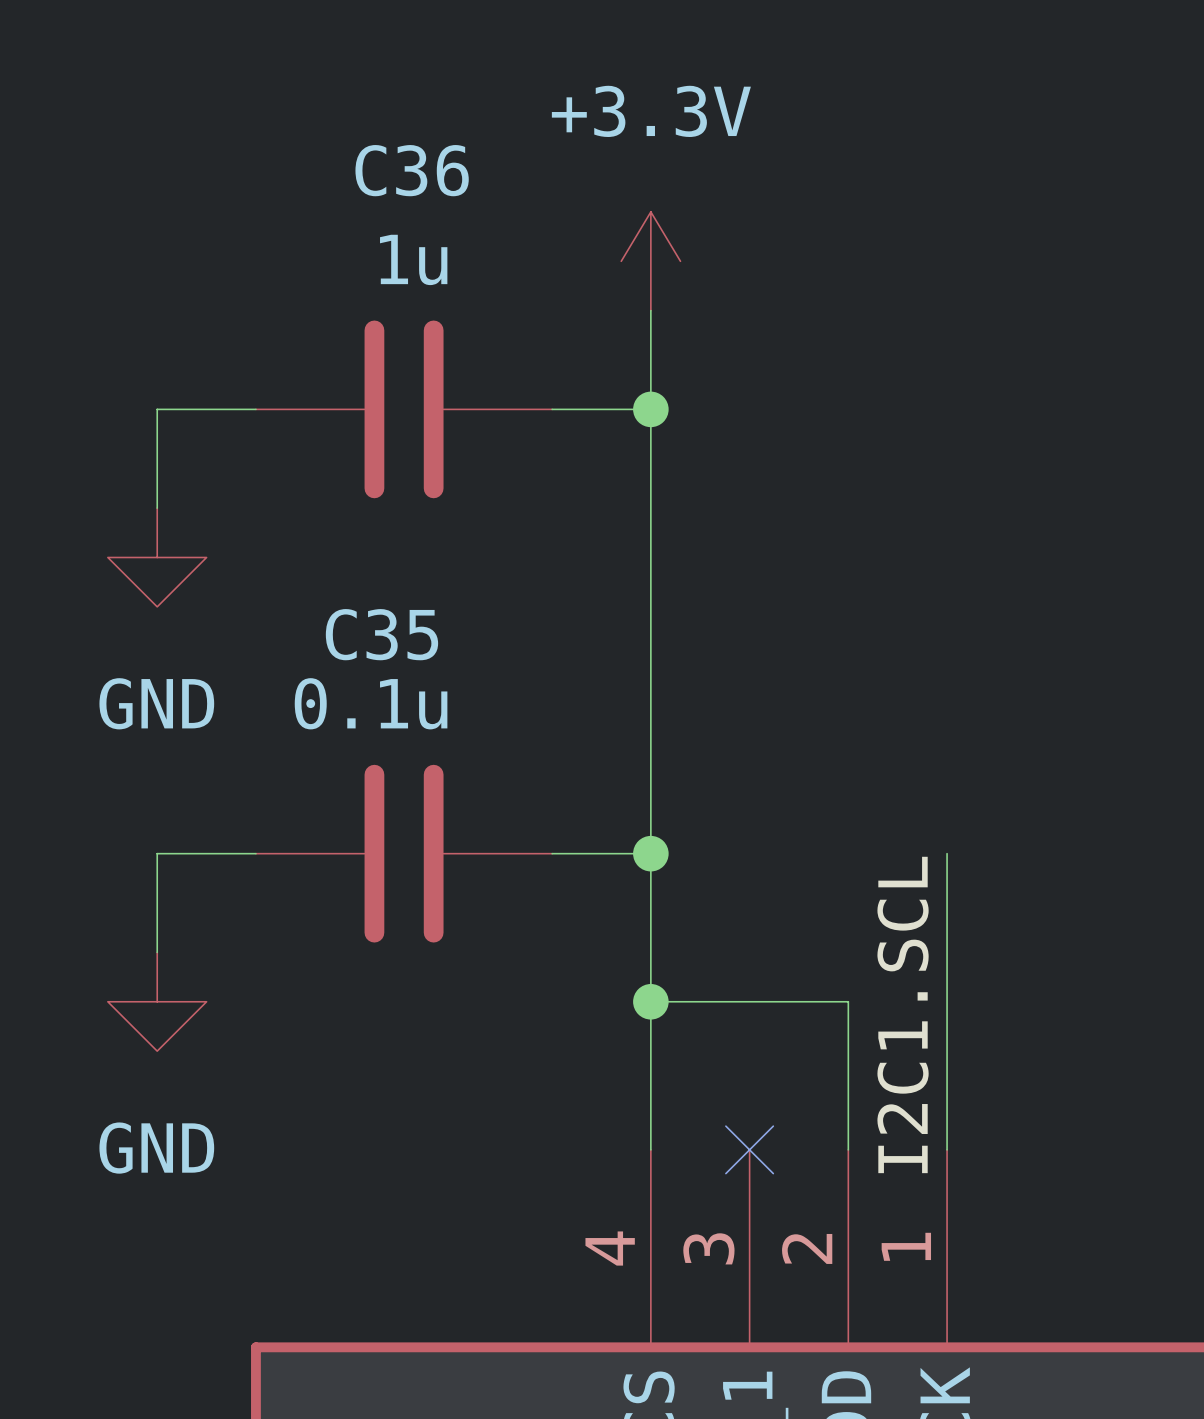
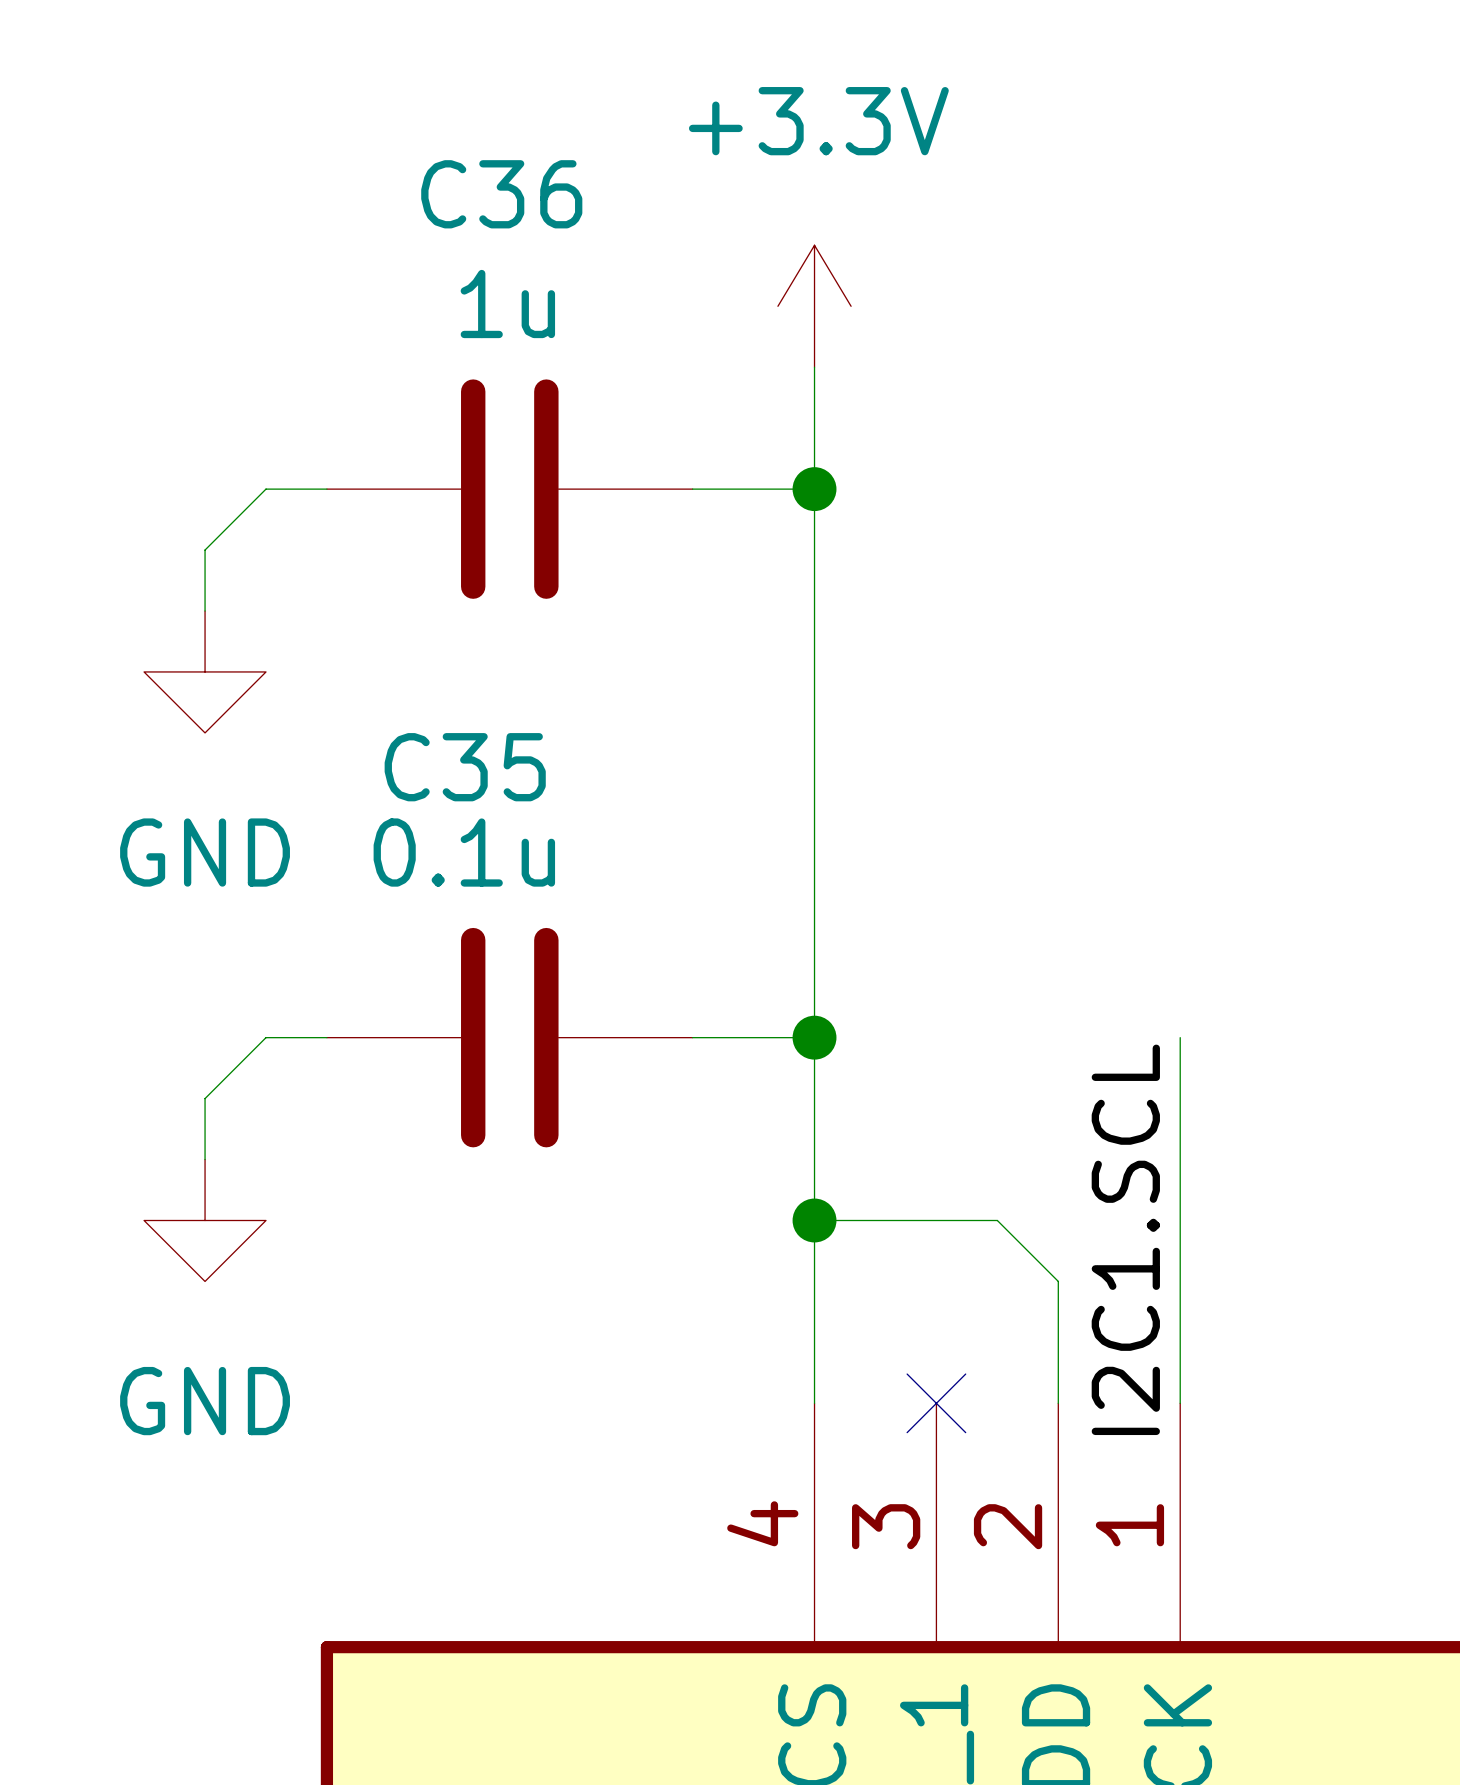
wire: (206, 409) (157, 409) (157, 458) -> (265, 489) (205, 550)
wire: (206, 853) (157, 853) (157, 903) -> (265, 1037) (205, 1098)
wire: (798, 1001) (848, 1001) (848, 1051) -> (997, 1220) (1058, 1281)

